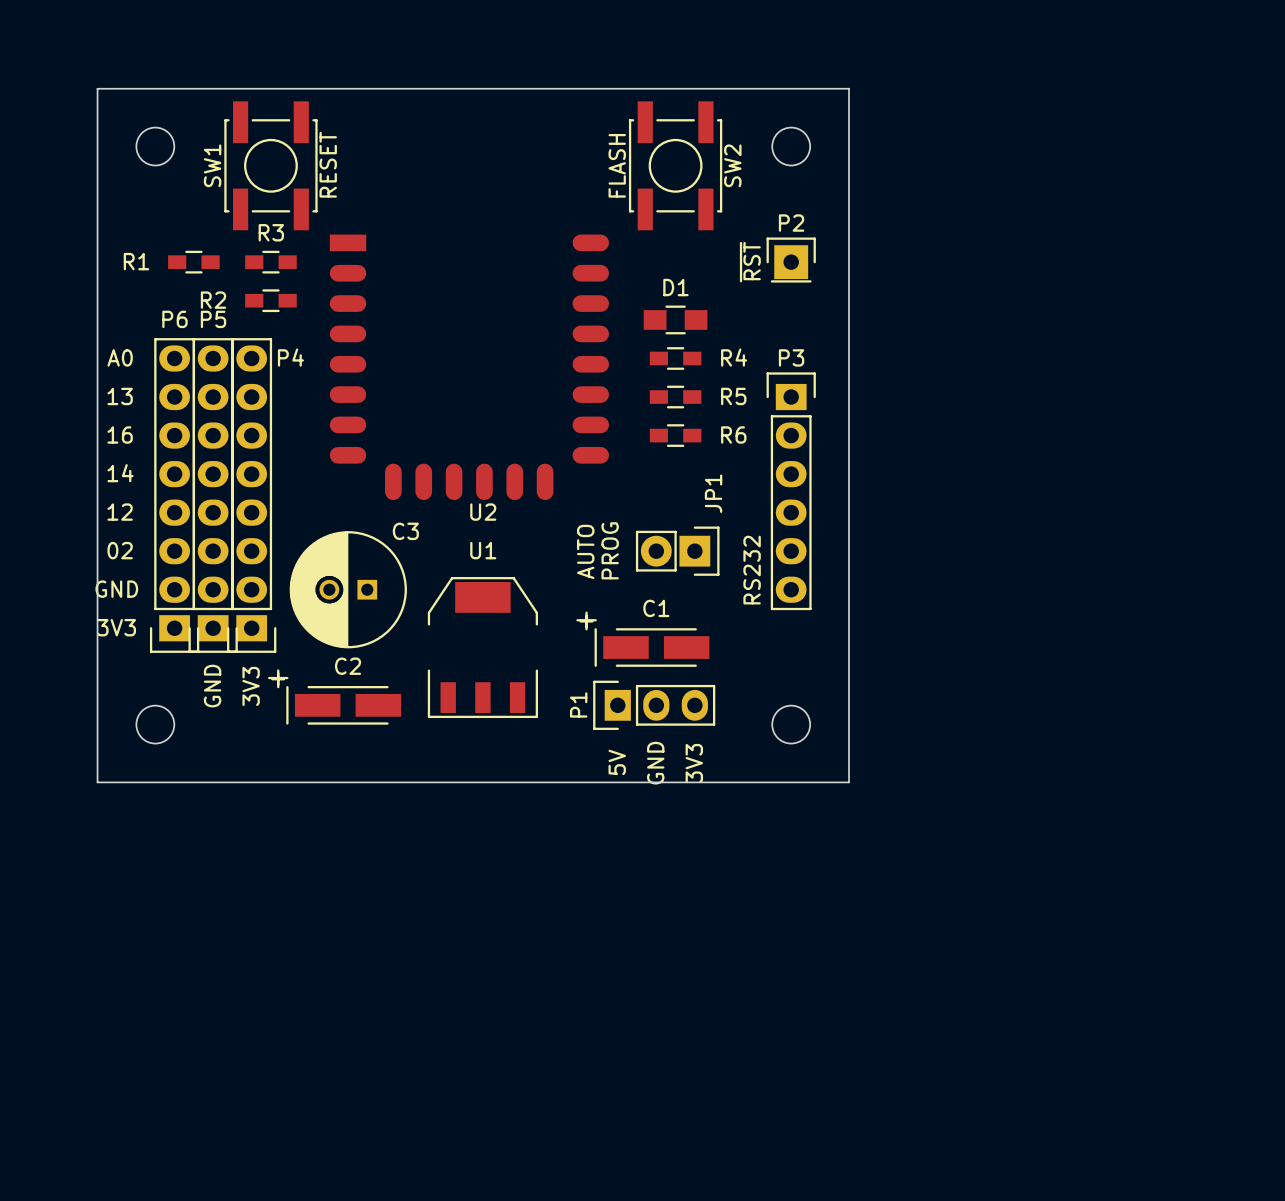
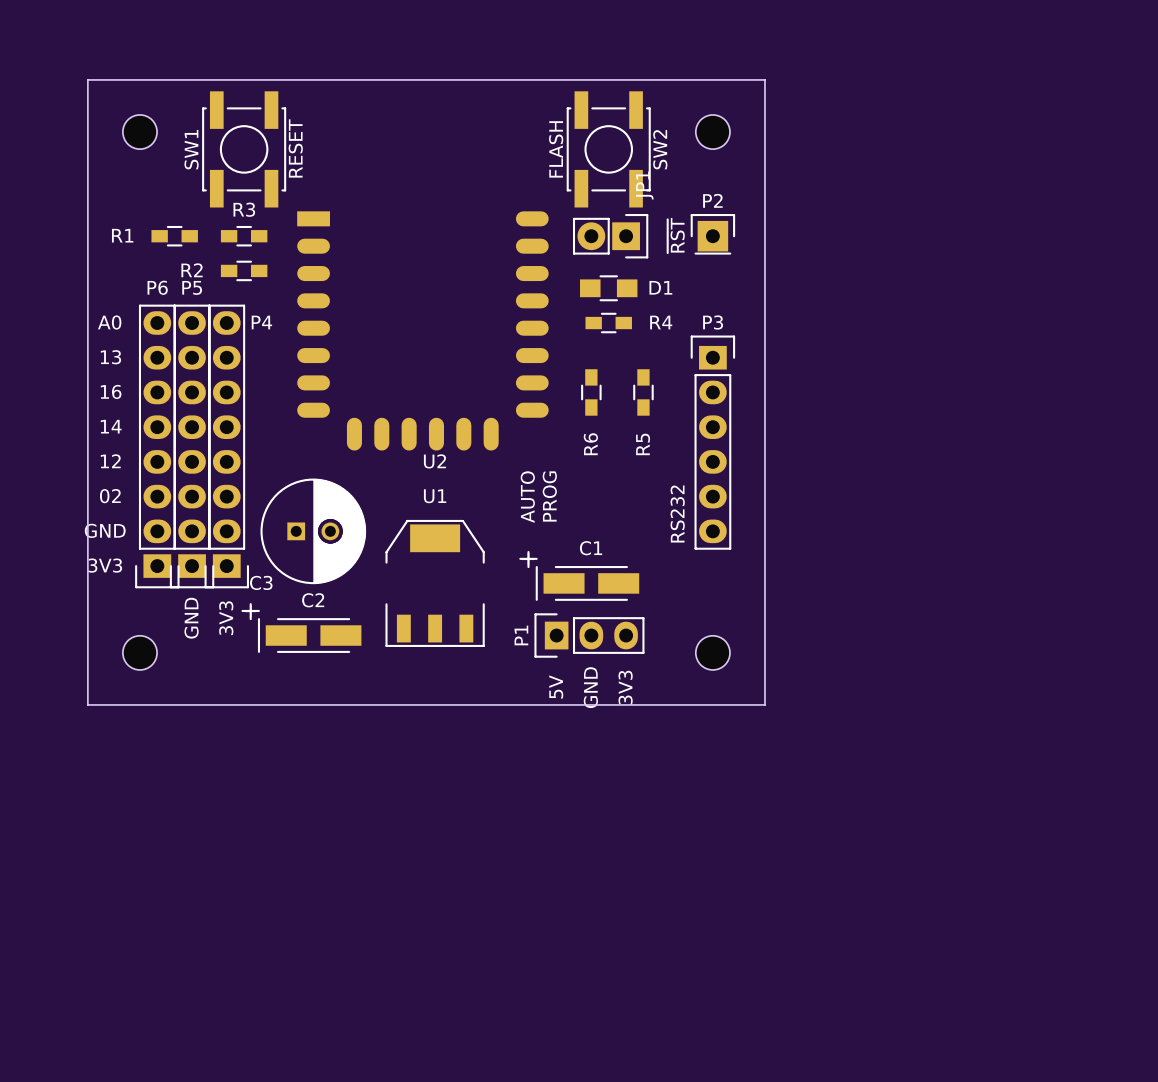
D1 name position: D1 (675, 287) -> D1 (660, 287)
R5 rotation: 0° (675, 397) -> 90° clockwise (643, 392)
R5 position: (675, 397) -> (643, 392)
R6 rotation: 0° (675, 435) -> 90° clockwise (591, 392)
JP1 position: (677, 551) -> (610, 236)
C3 rotation: 0° (348, 589) -> 180° (313, 531)

